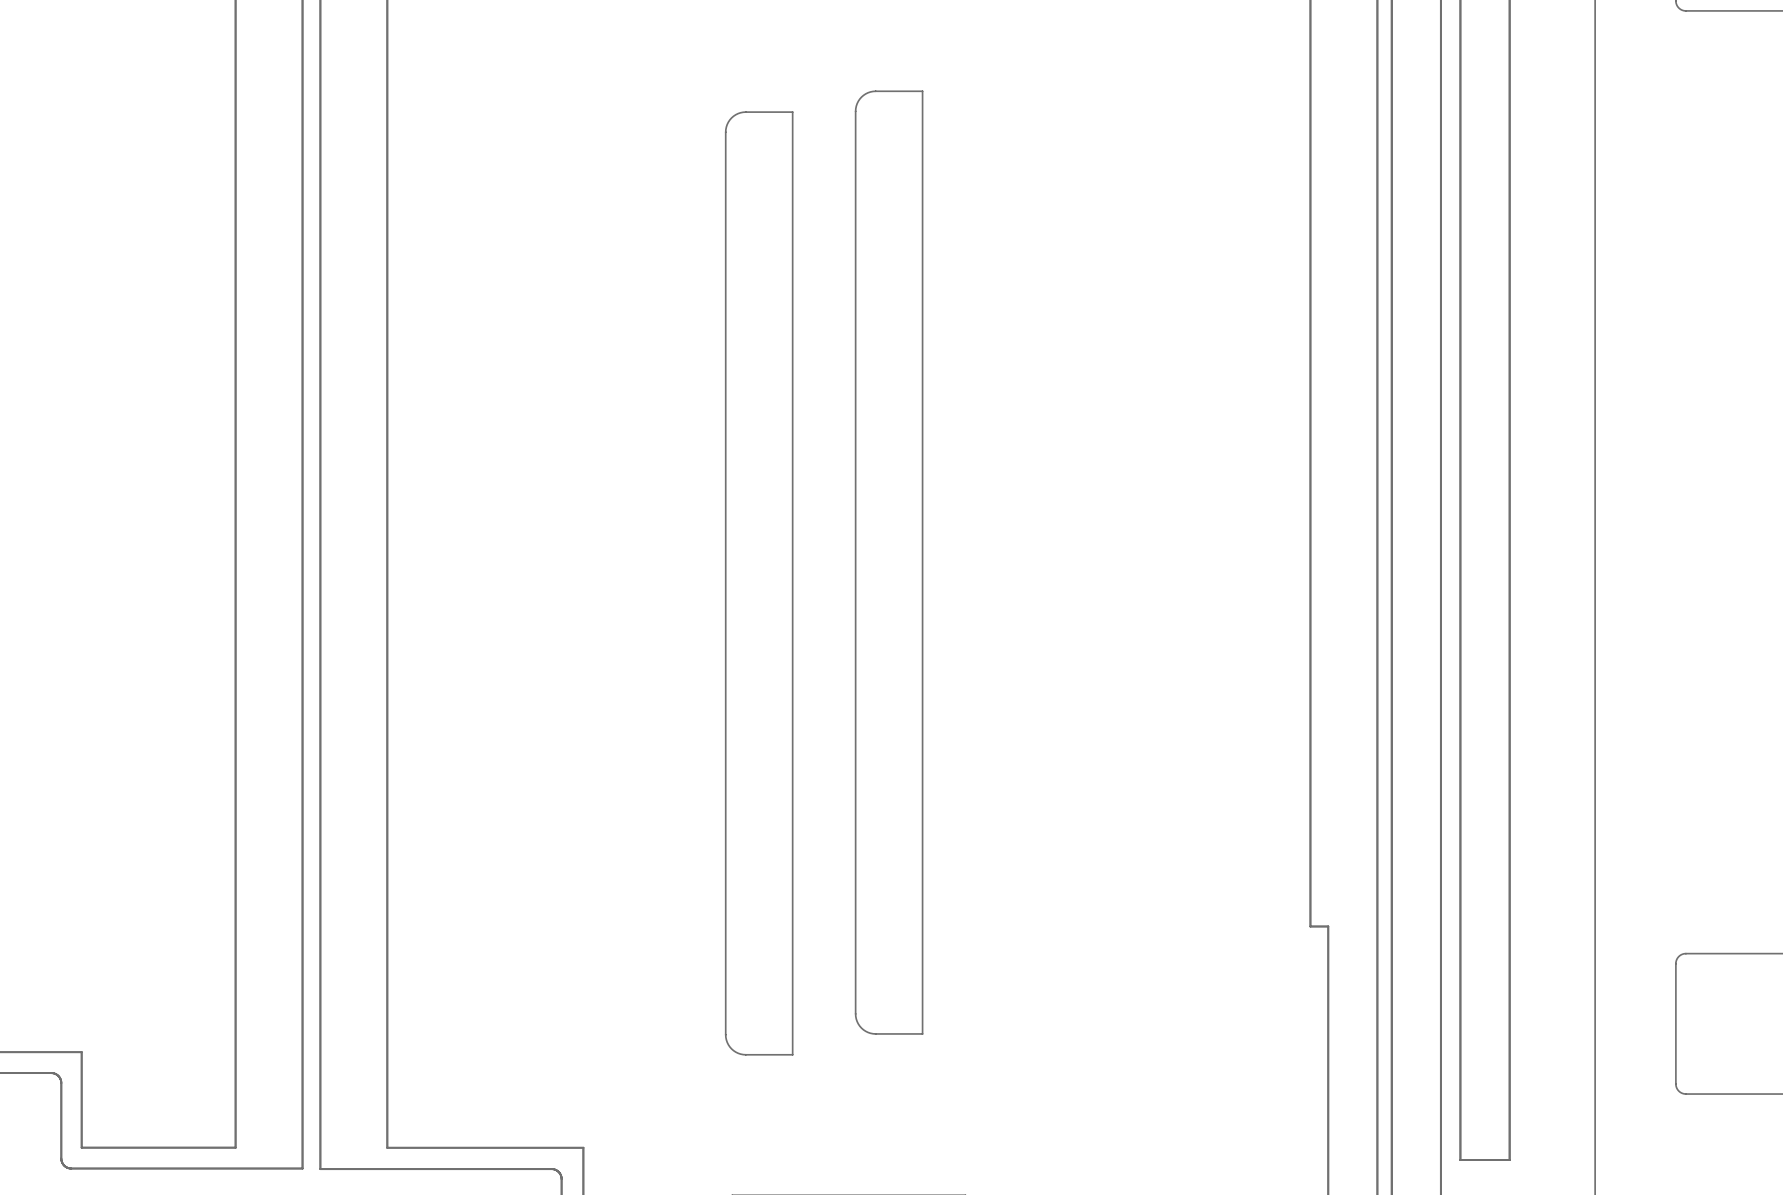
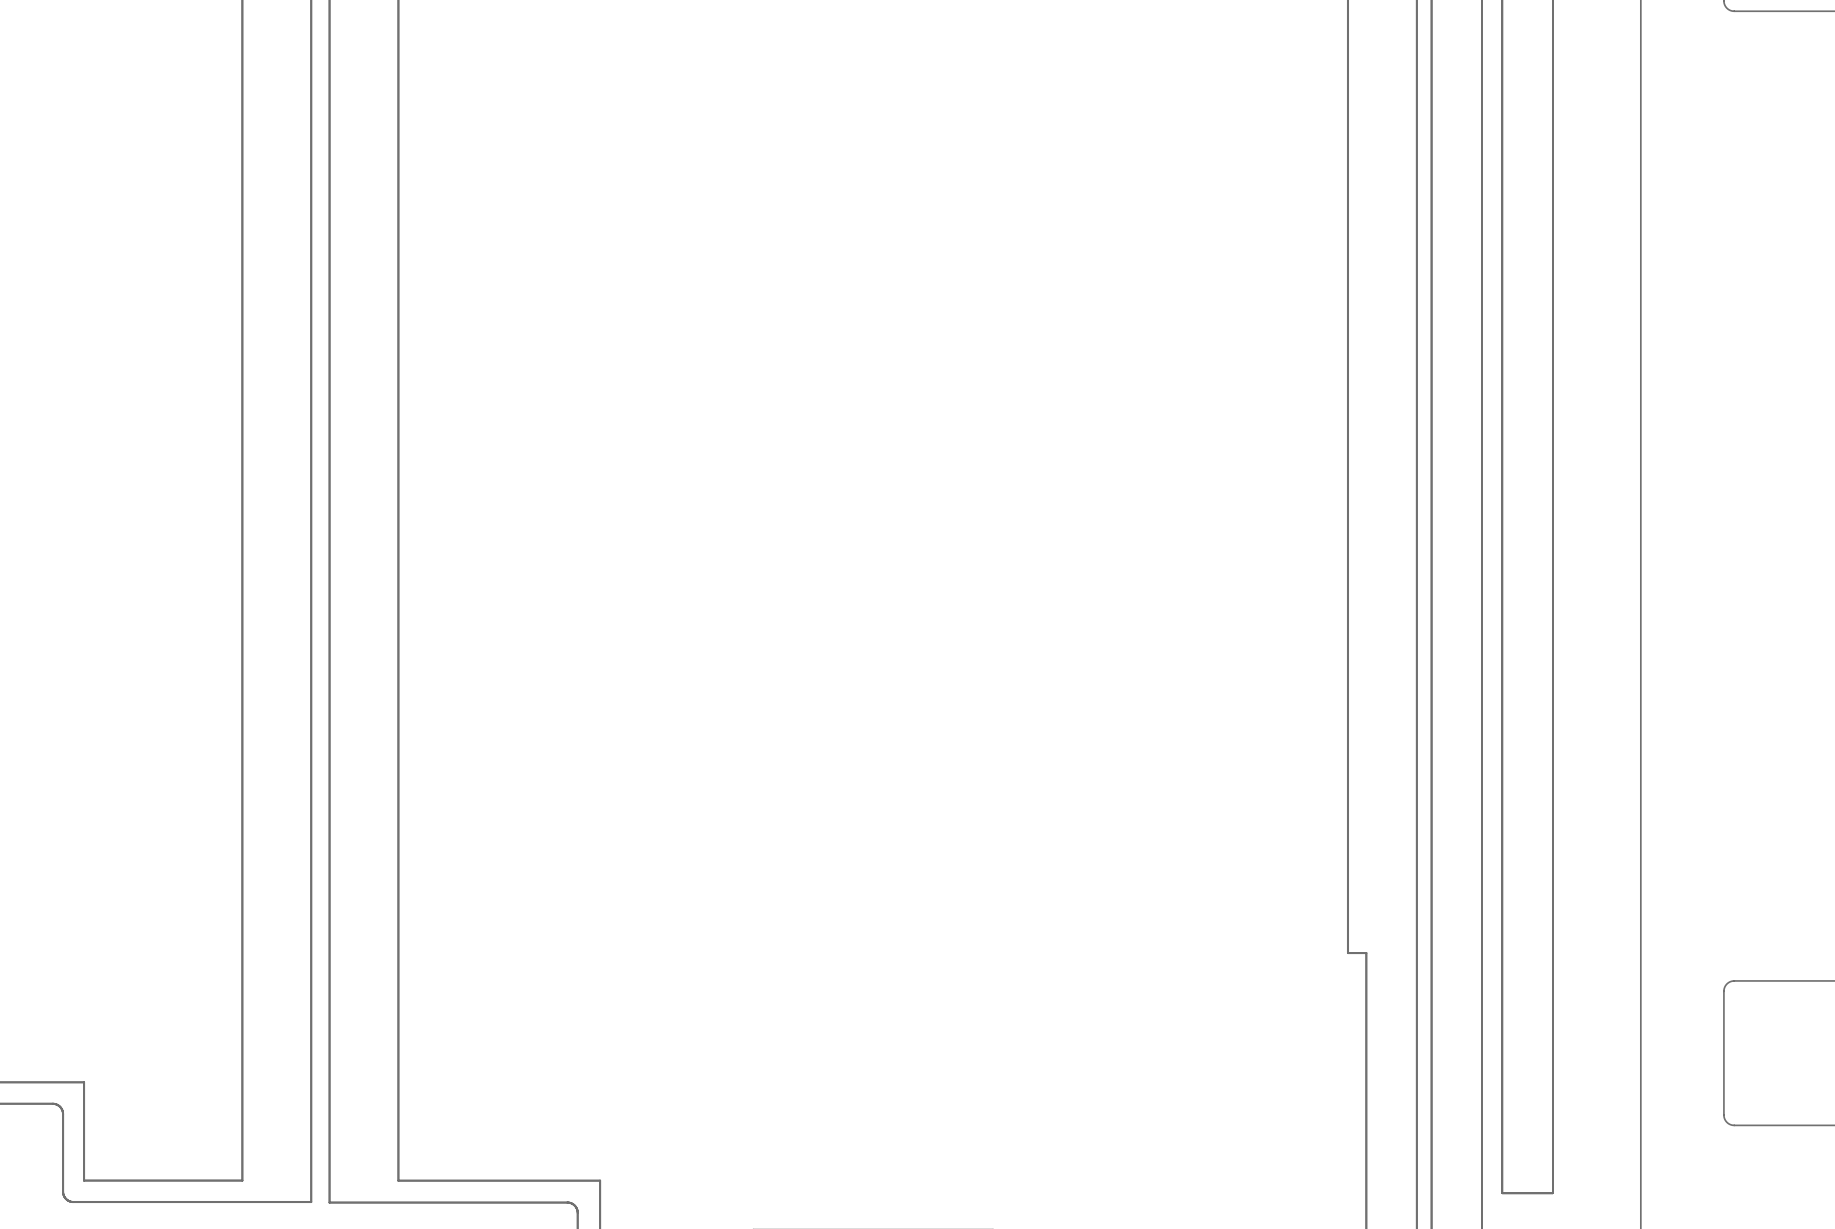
line: (875, 91) (922, 91) (922, 1033) (870, 1033) (859, 1026) (855, 1013) (855, 111) (857, 103) (861, 97) (868, 92) (875, 91) -> none
line: (745, 112) (792, 112) (792, 1054) (740, 1054) (729, 1046) (725, 1034) (725, 132) (727, 124) (731, 117) (738, 113) (745, 112) -> none

